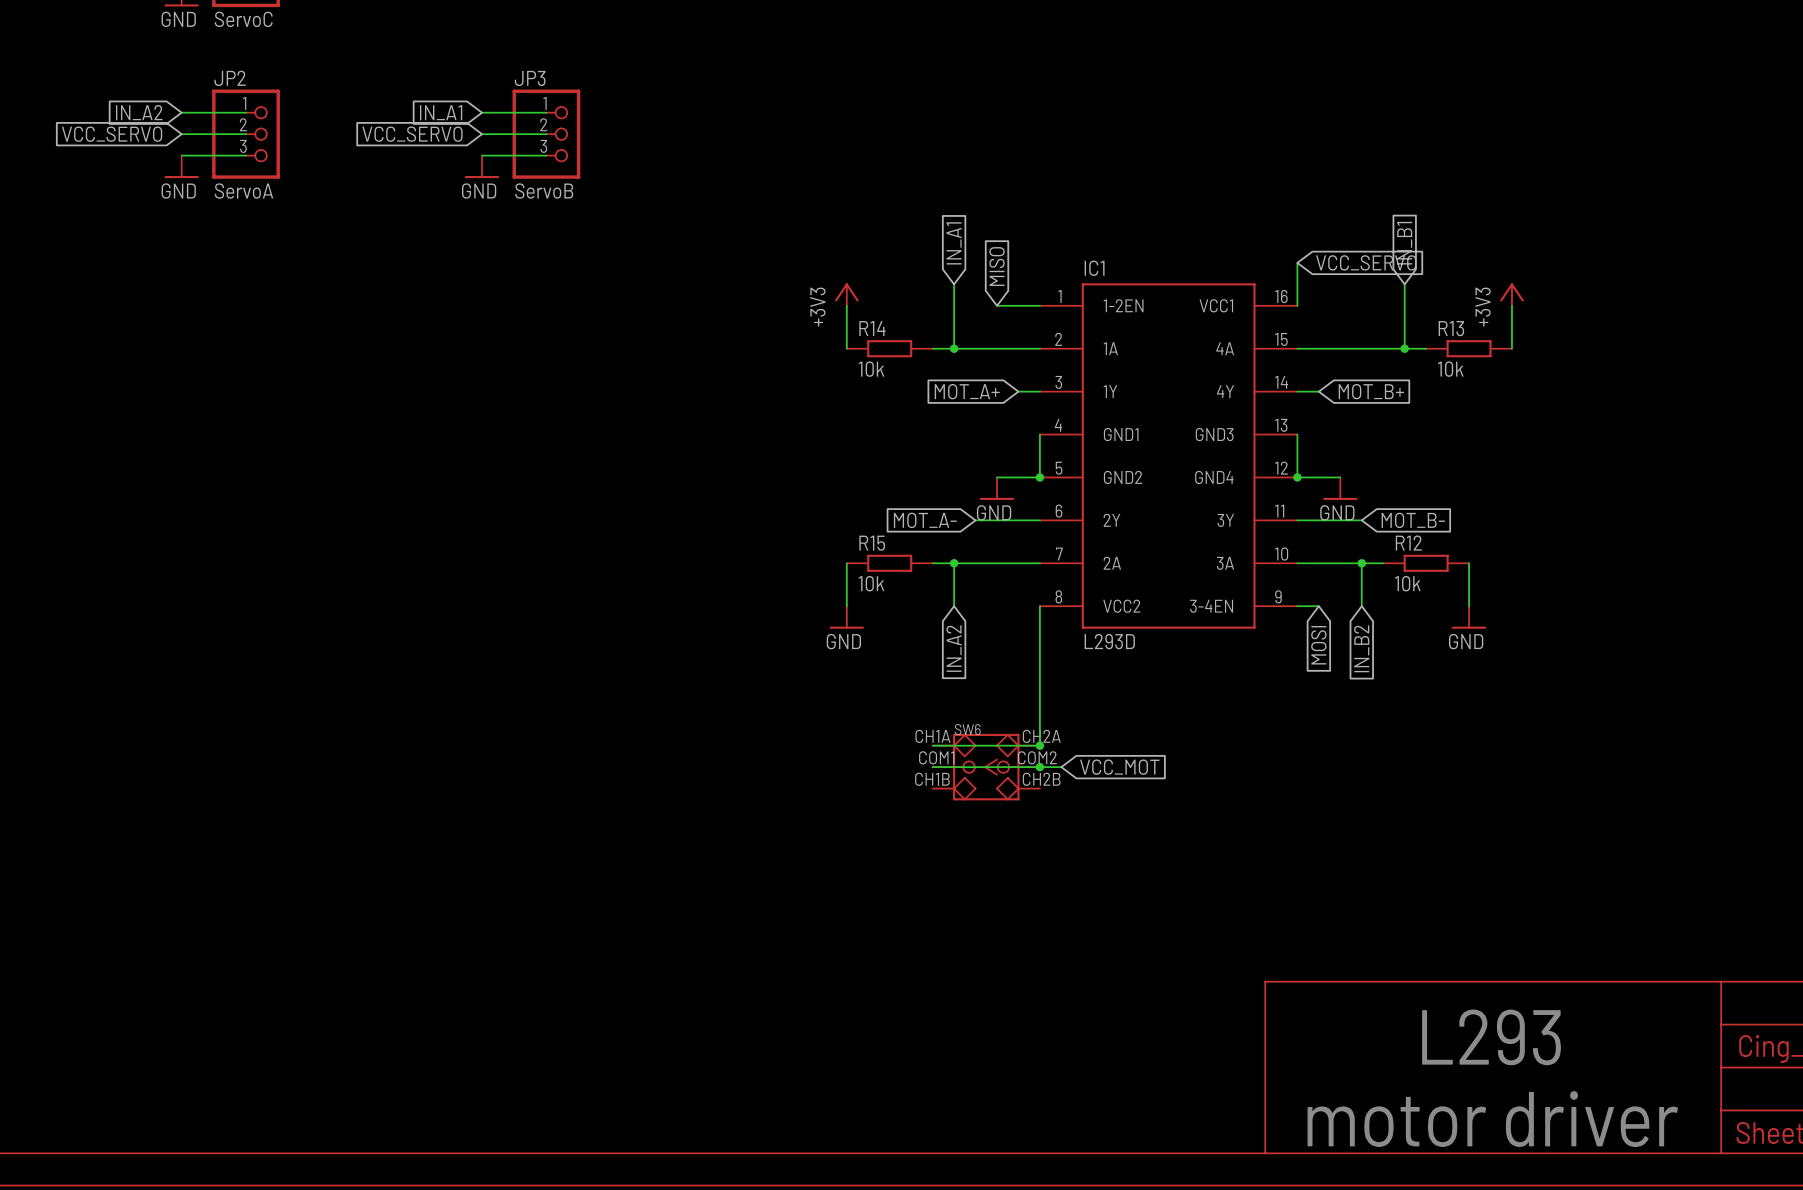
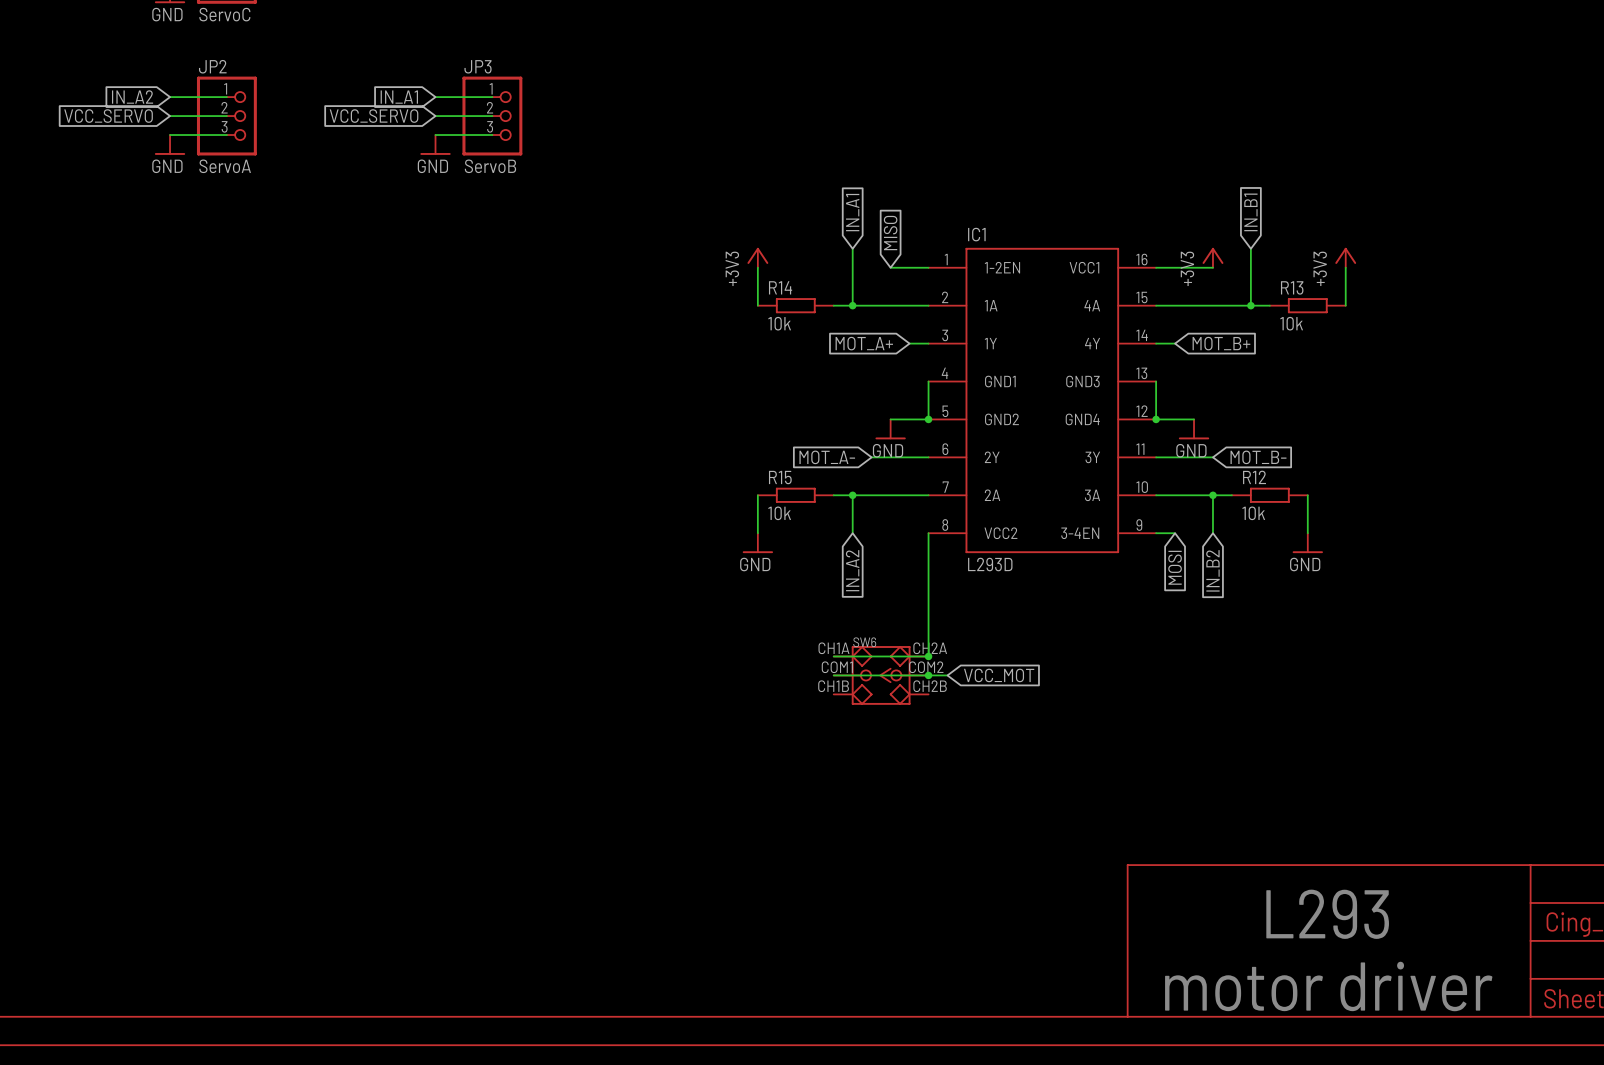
wire: (1297, 262) (1297, 305) -> (1212, 267) (1156, 267)
global label: VCC_SERVO (1366, 262) -> none
power symbol: none -> +3V3 (1212, 257)

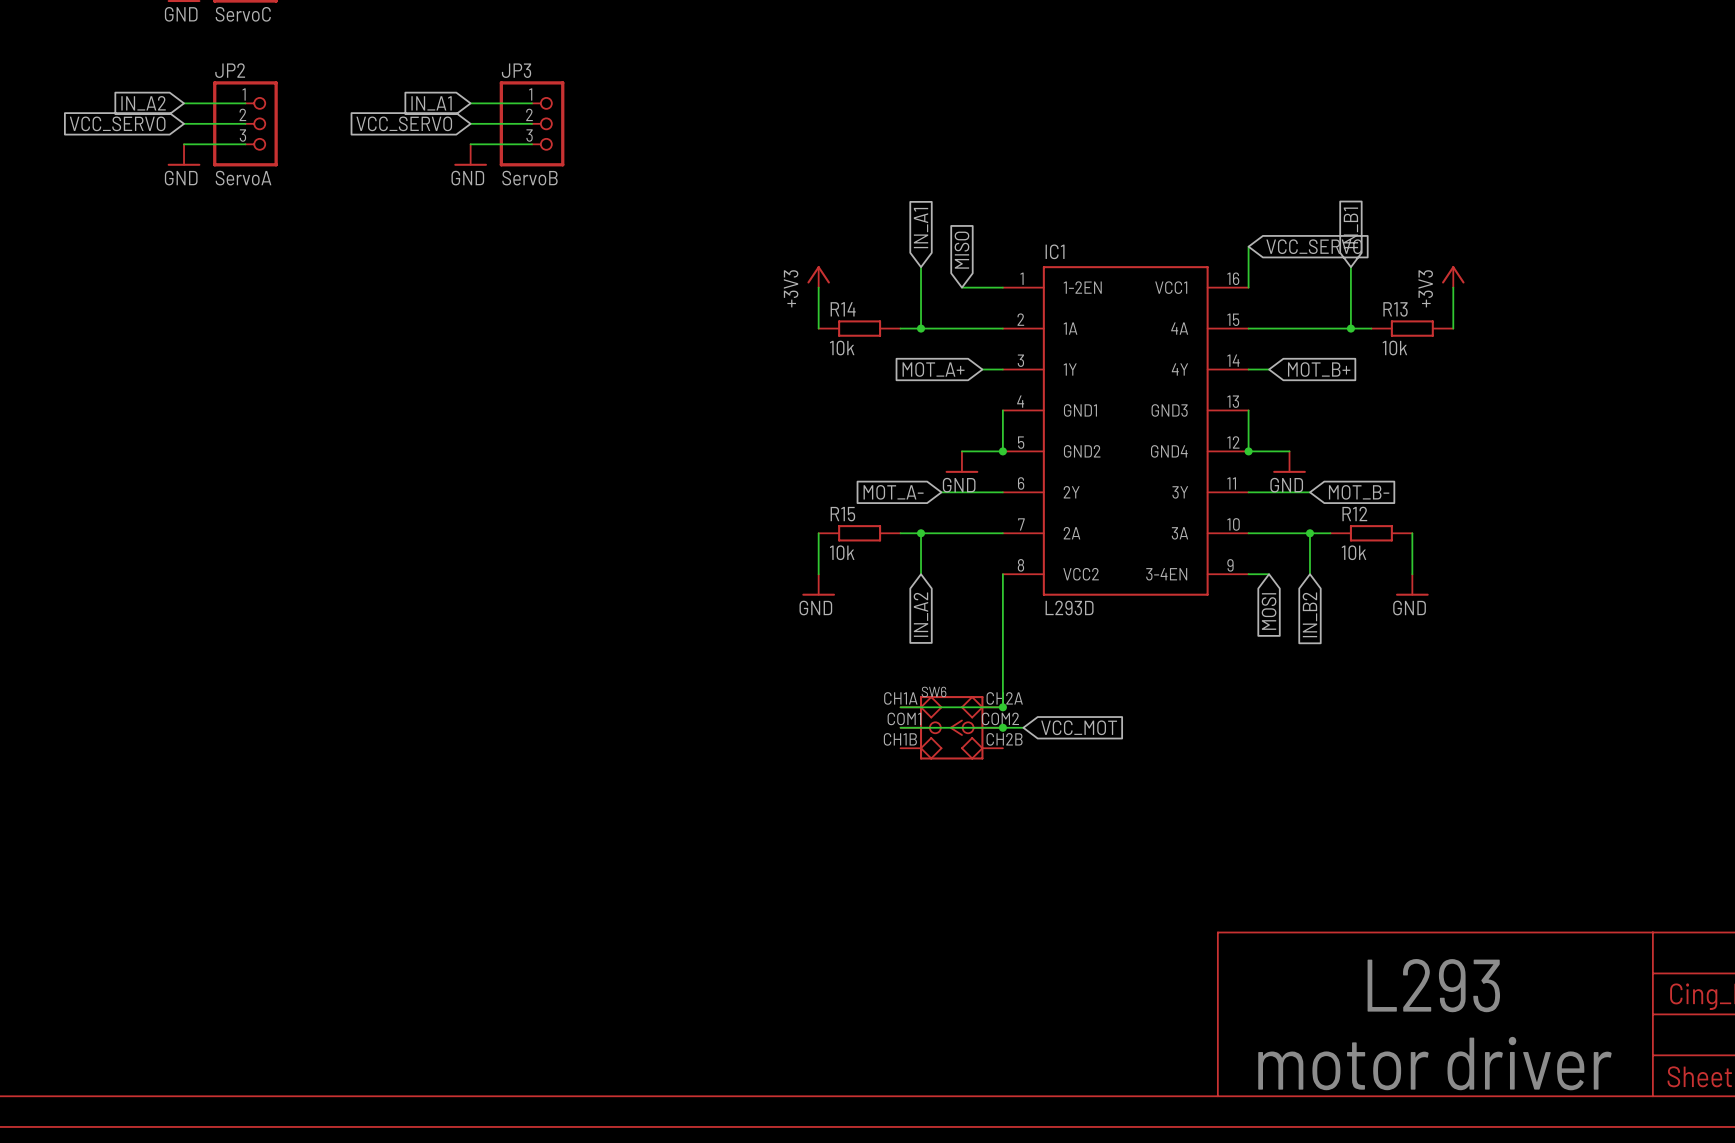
global label: none -> VCC_SERVO (1314, 246)
power symbol: +3V3 (1212, 257) -> none
wire: (1156, 267) (1212, 267) -> (1248, 287) (1248, 246)

